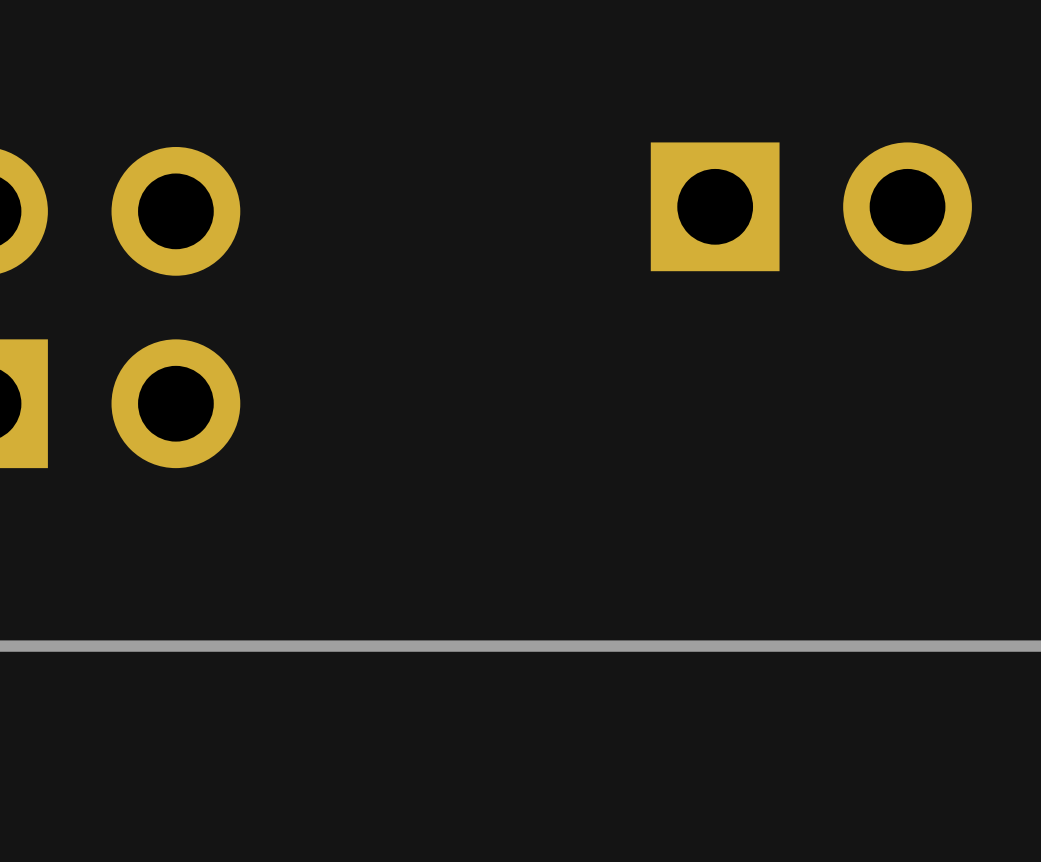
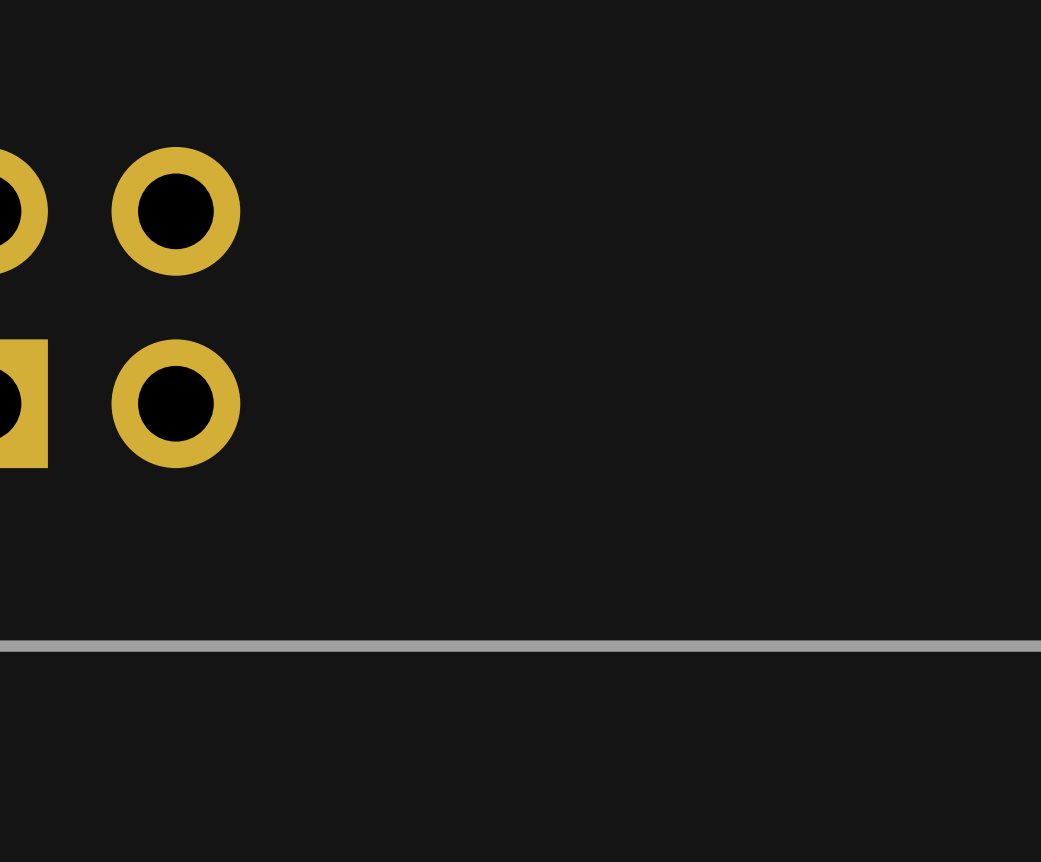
part: (811, 206) -> none

